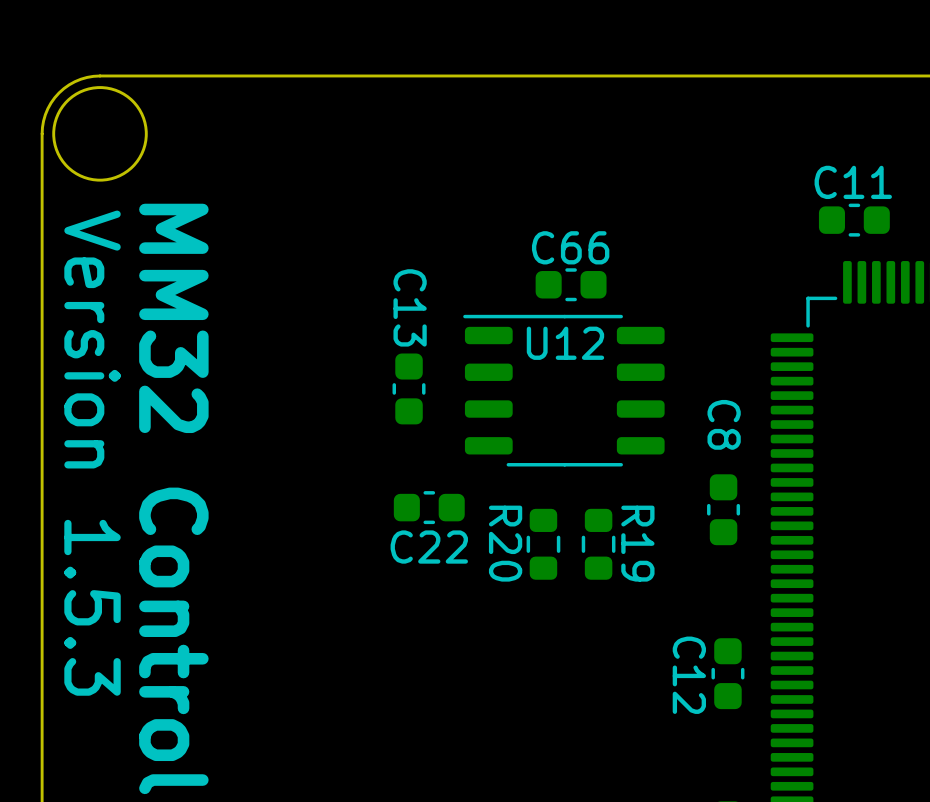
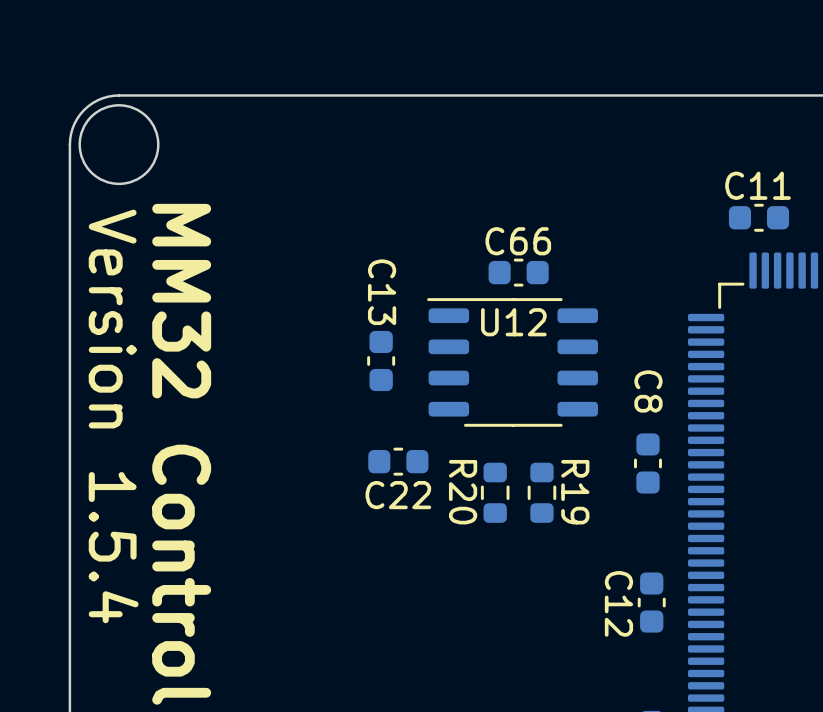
text: Version 1.5.3 (92, 453) -> Version 1.5.4 (113, 416)

